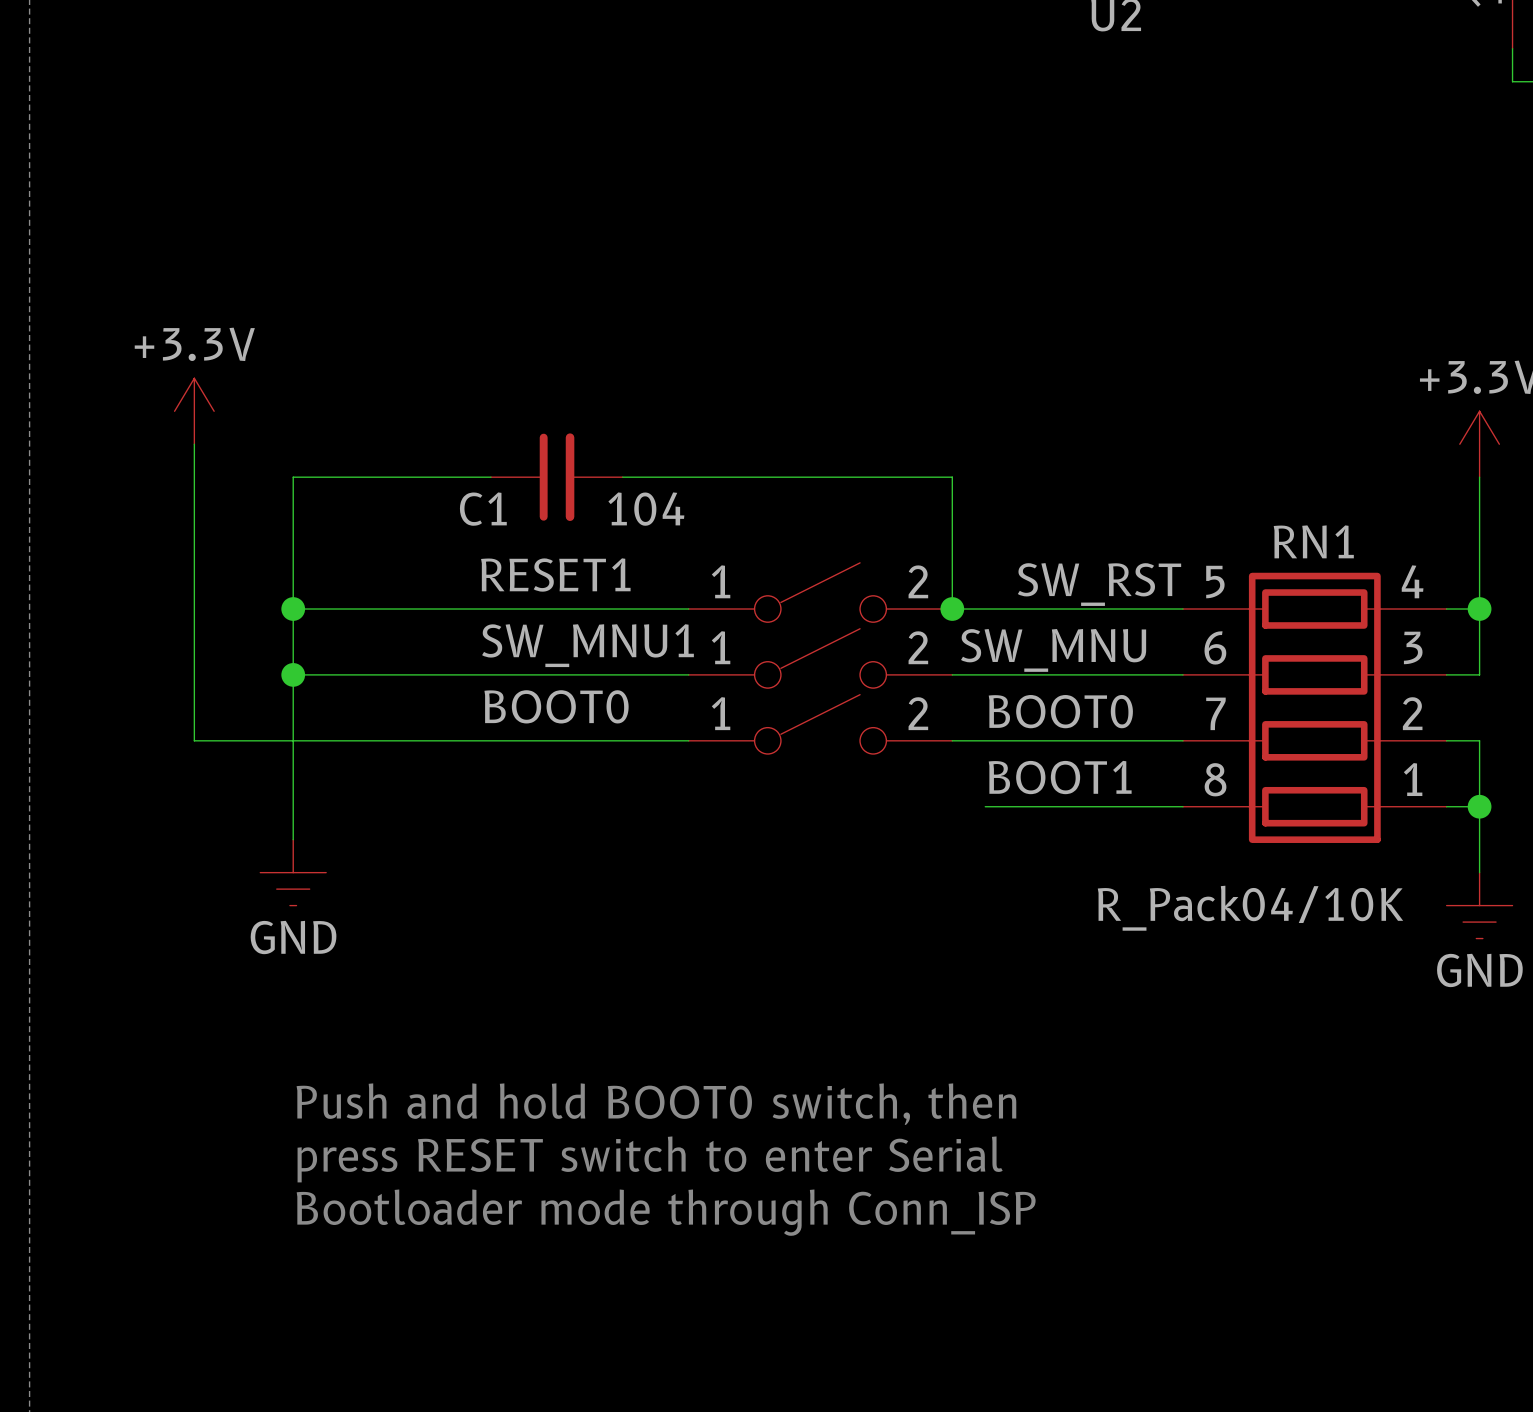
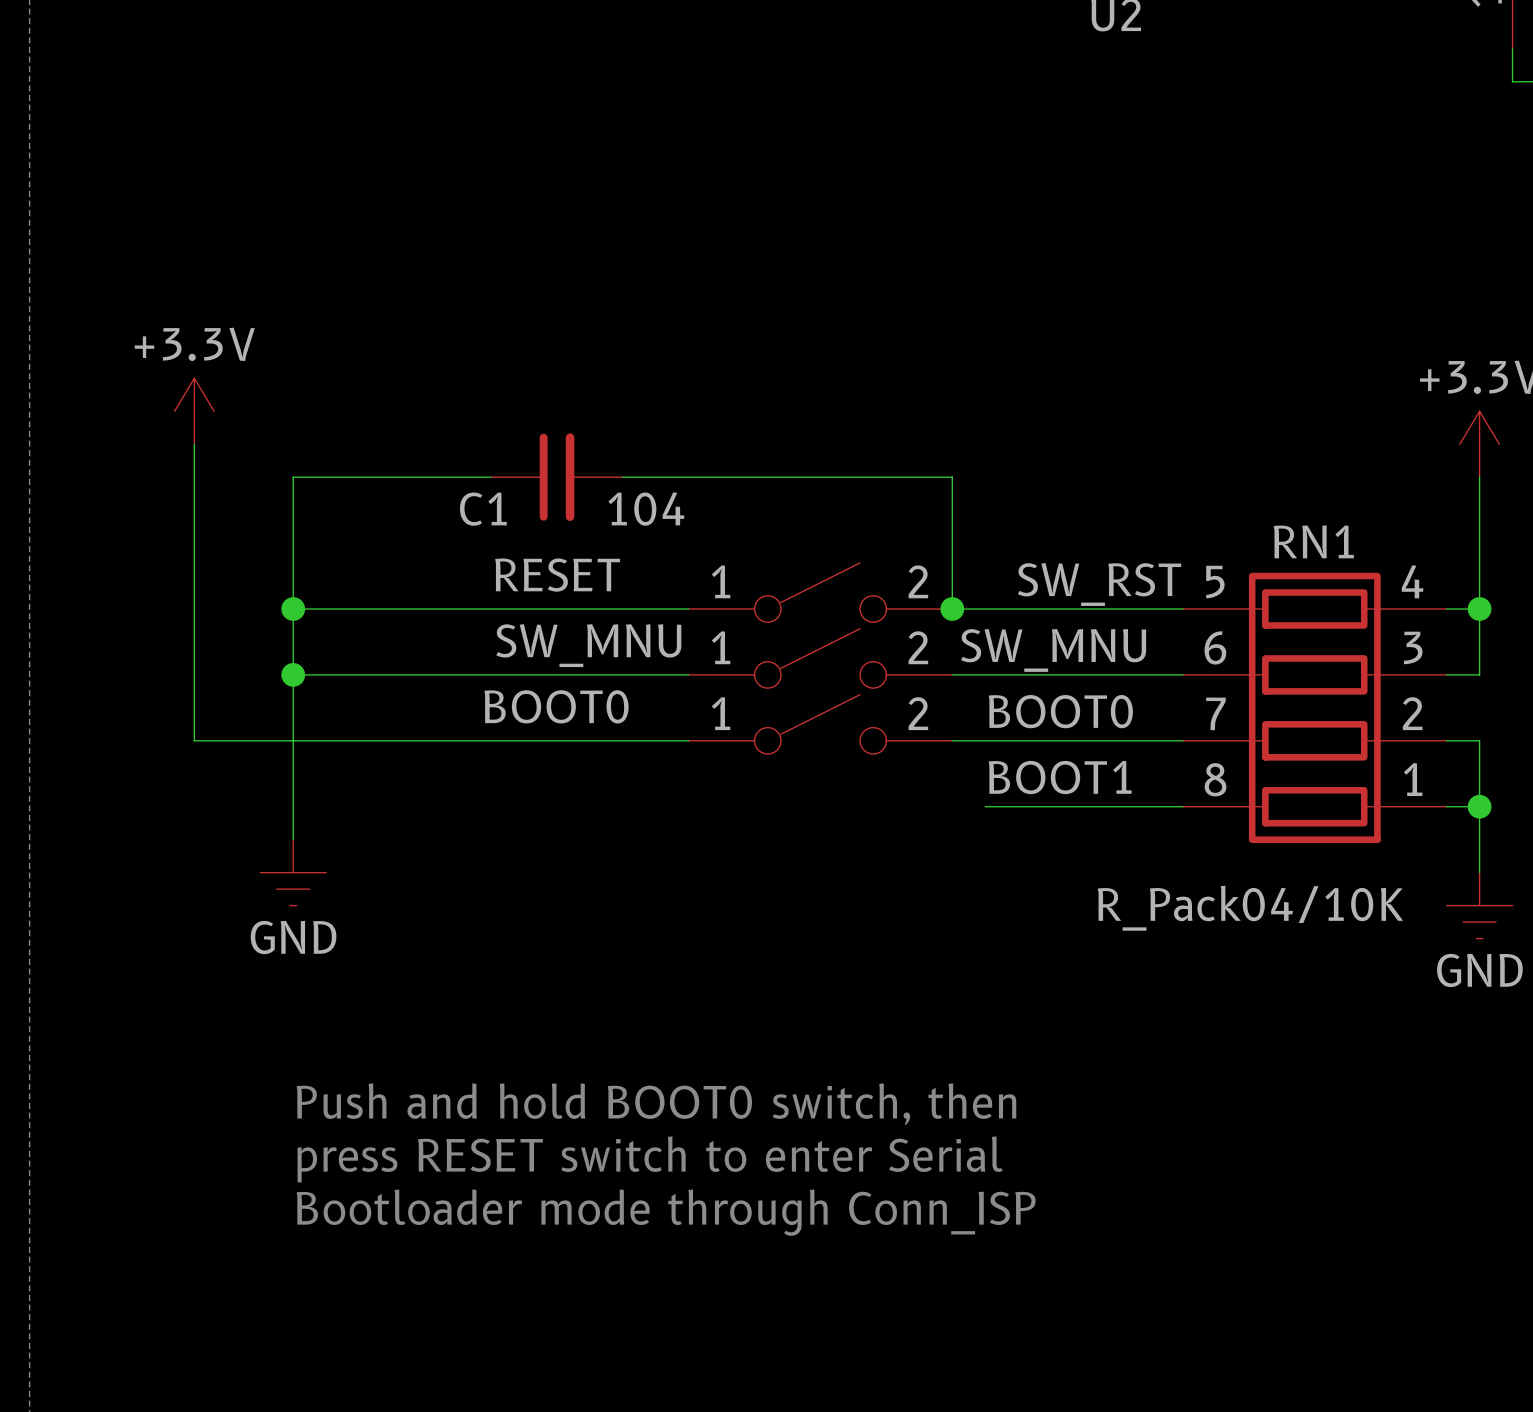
RESET1 name: RESET1 (555, 575) -> RESET (557, 575)
SW_MNU1 name: SW_MNU1 (587, 645) -> SW_MNU (588, 645)

